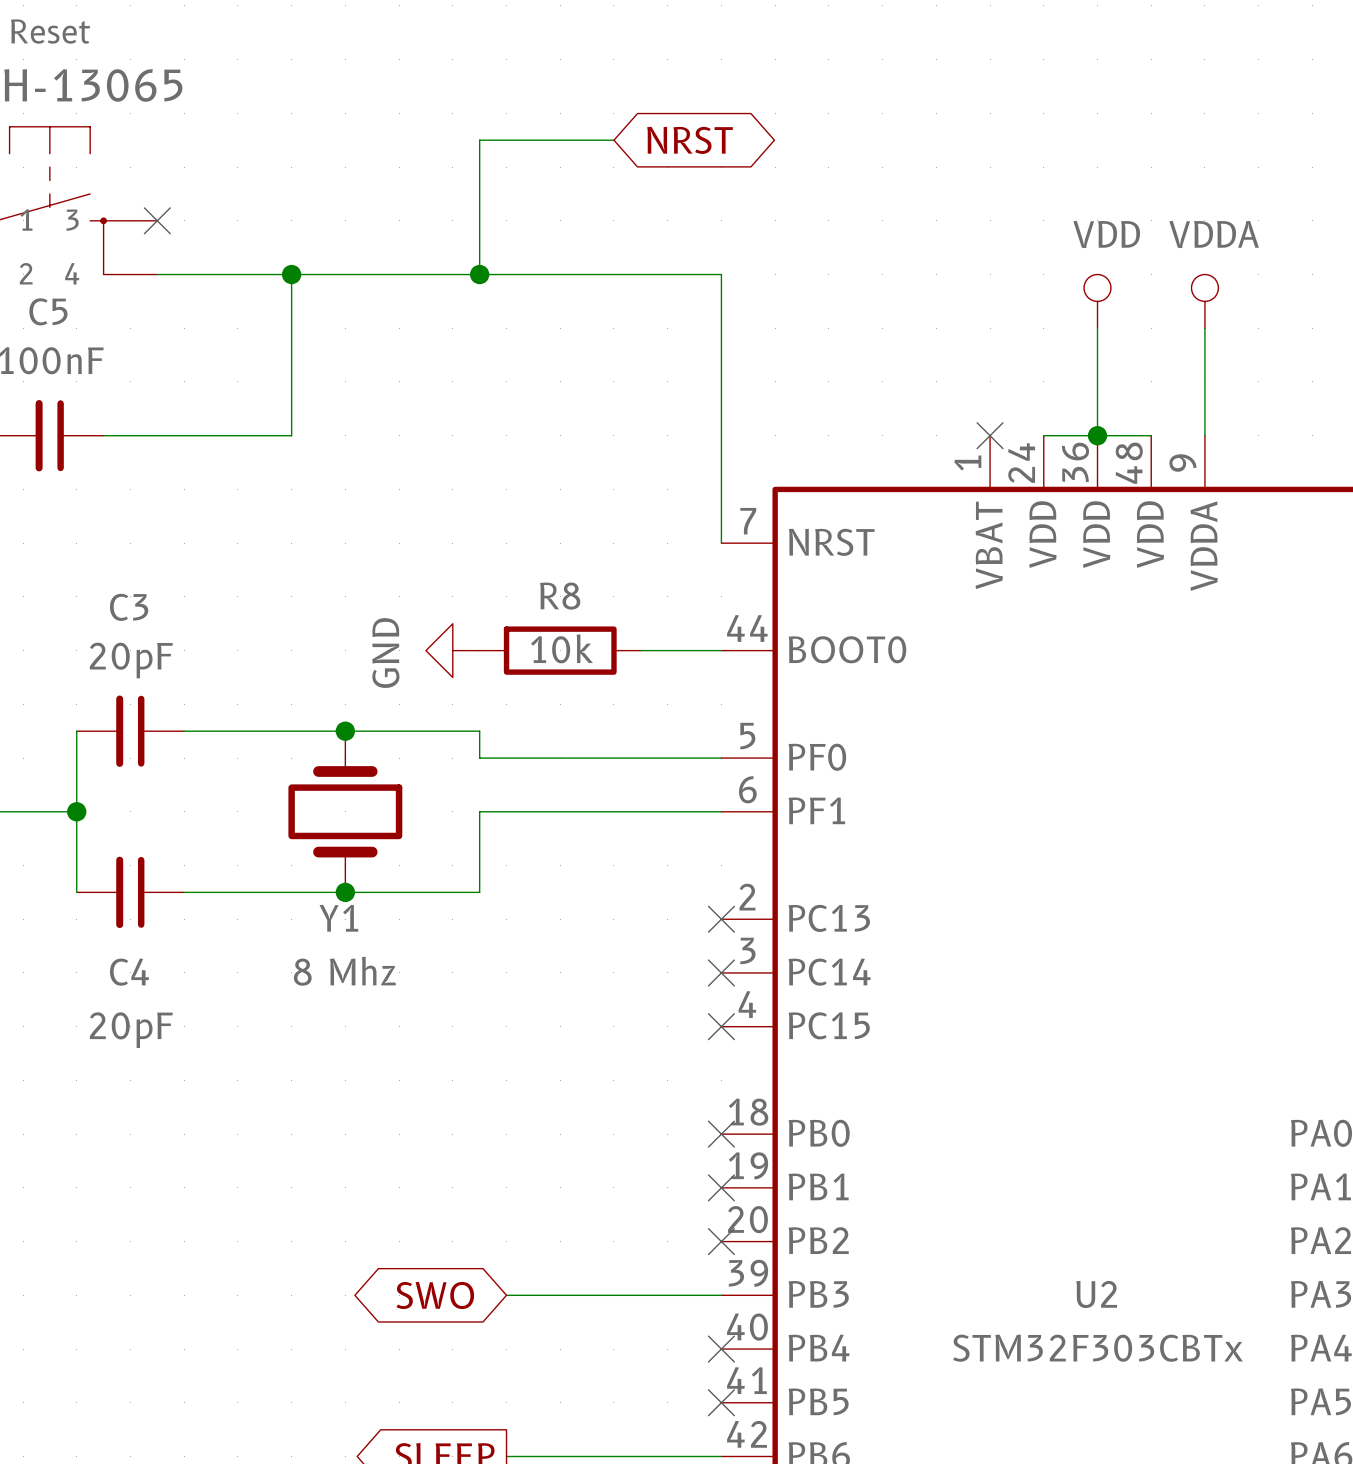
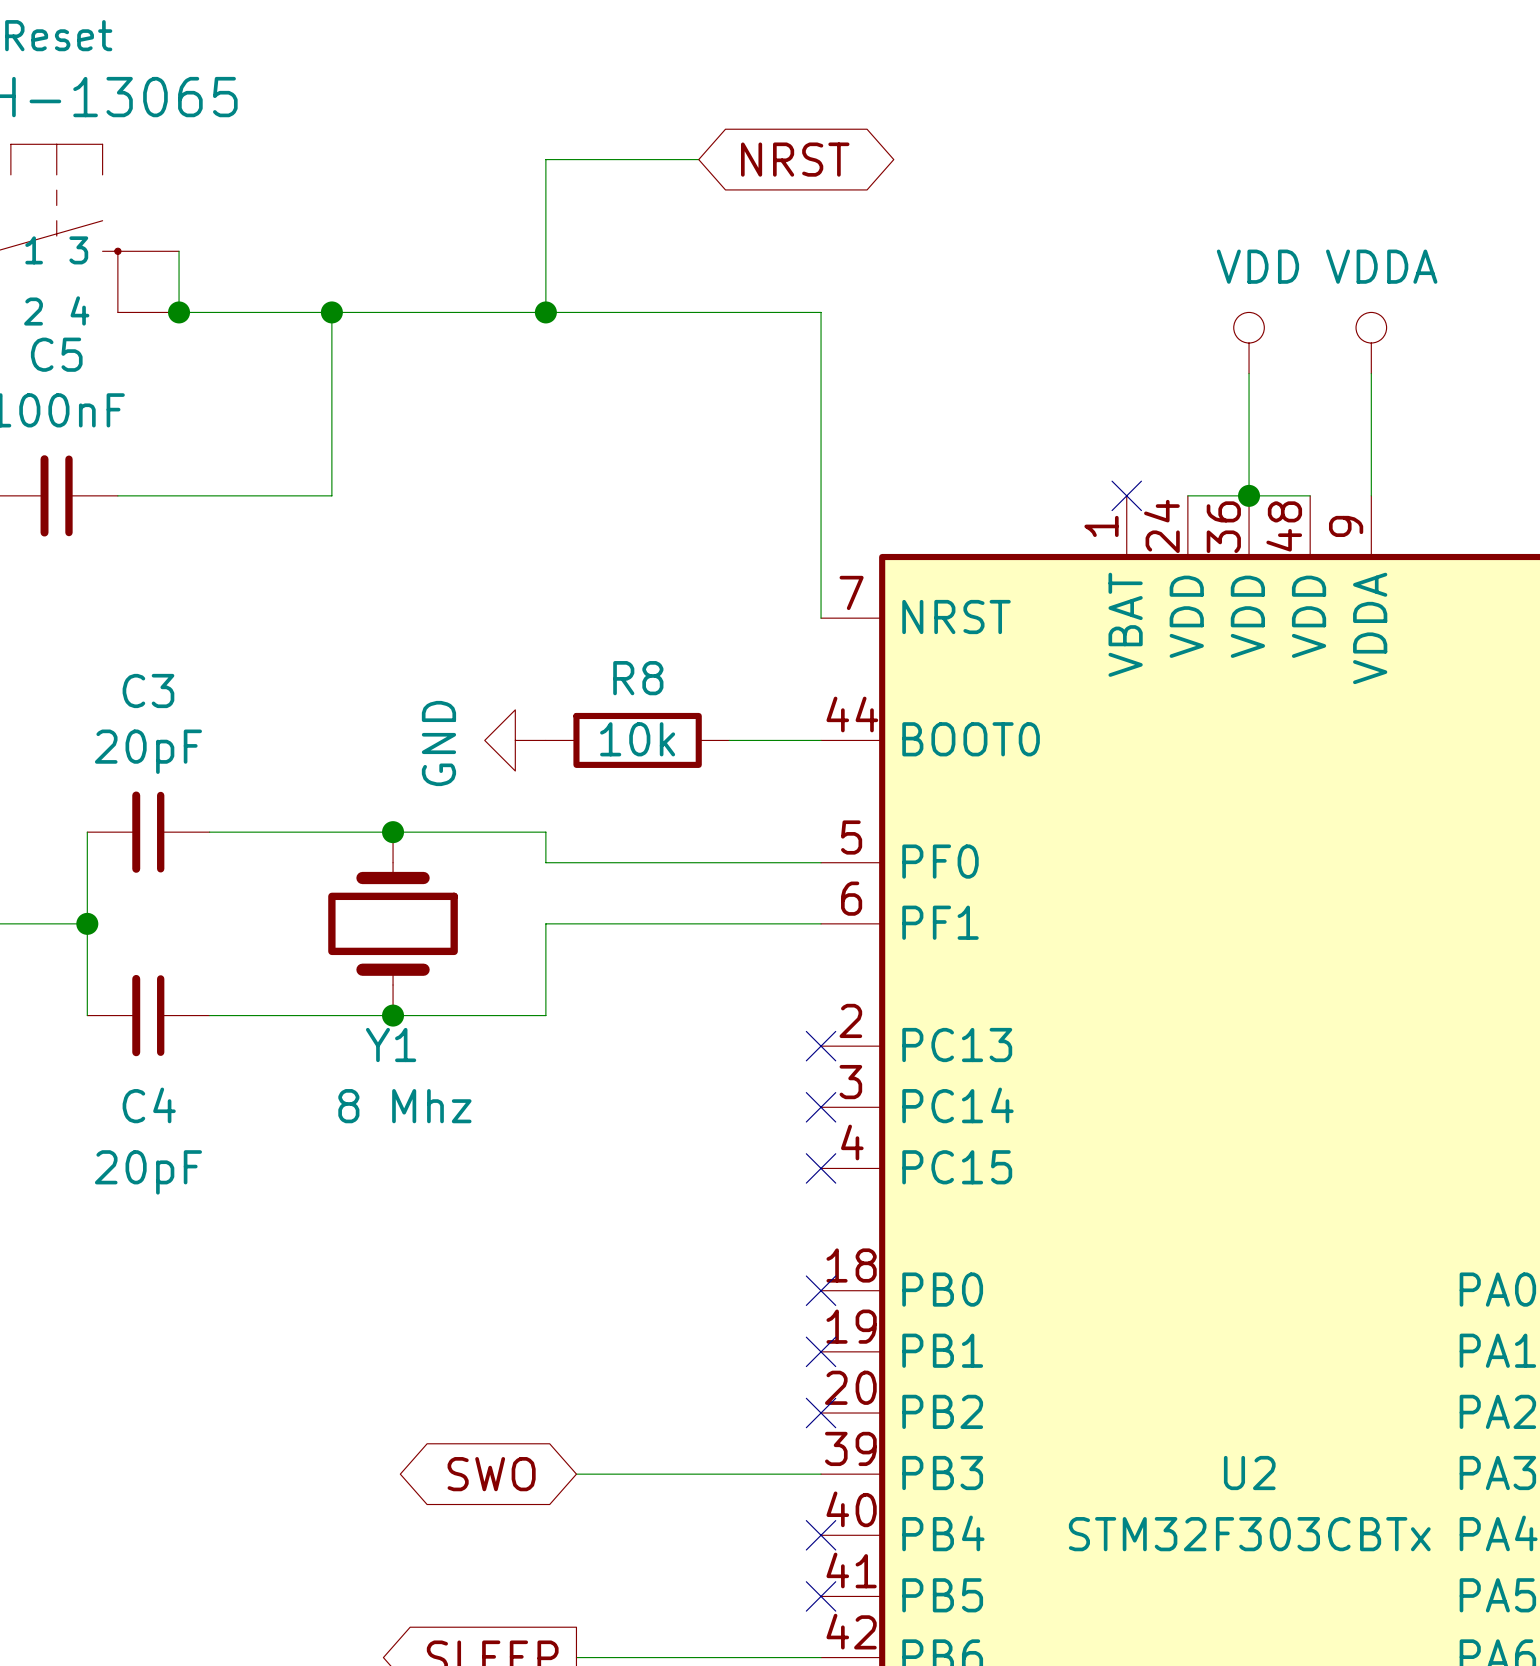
wire: none -> (179, 251) (179, 312)
no-connect mark: (157, 220) -> none
junction: none -> (179, 312)

